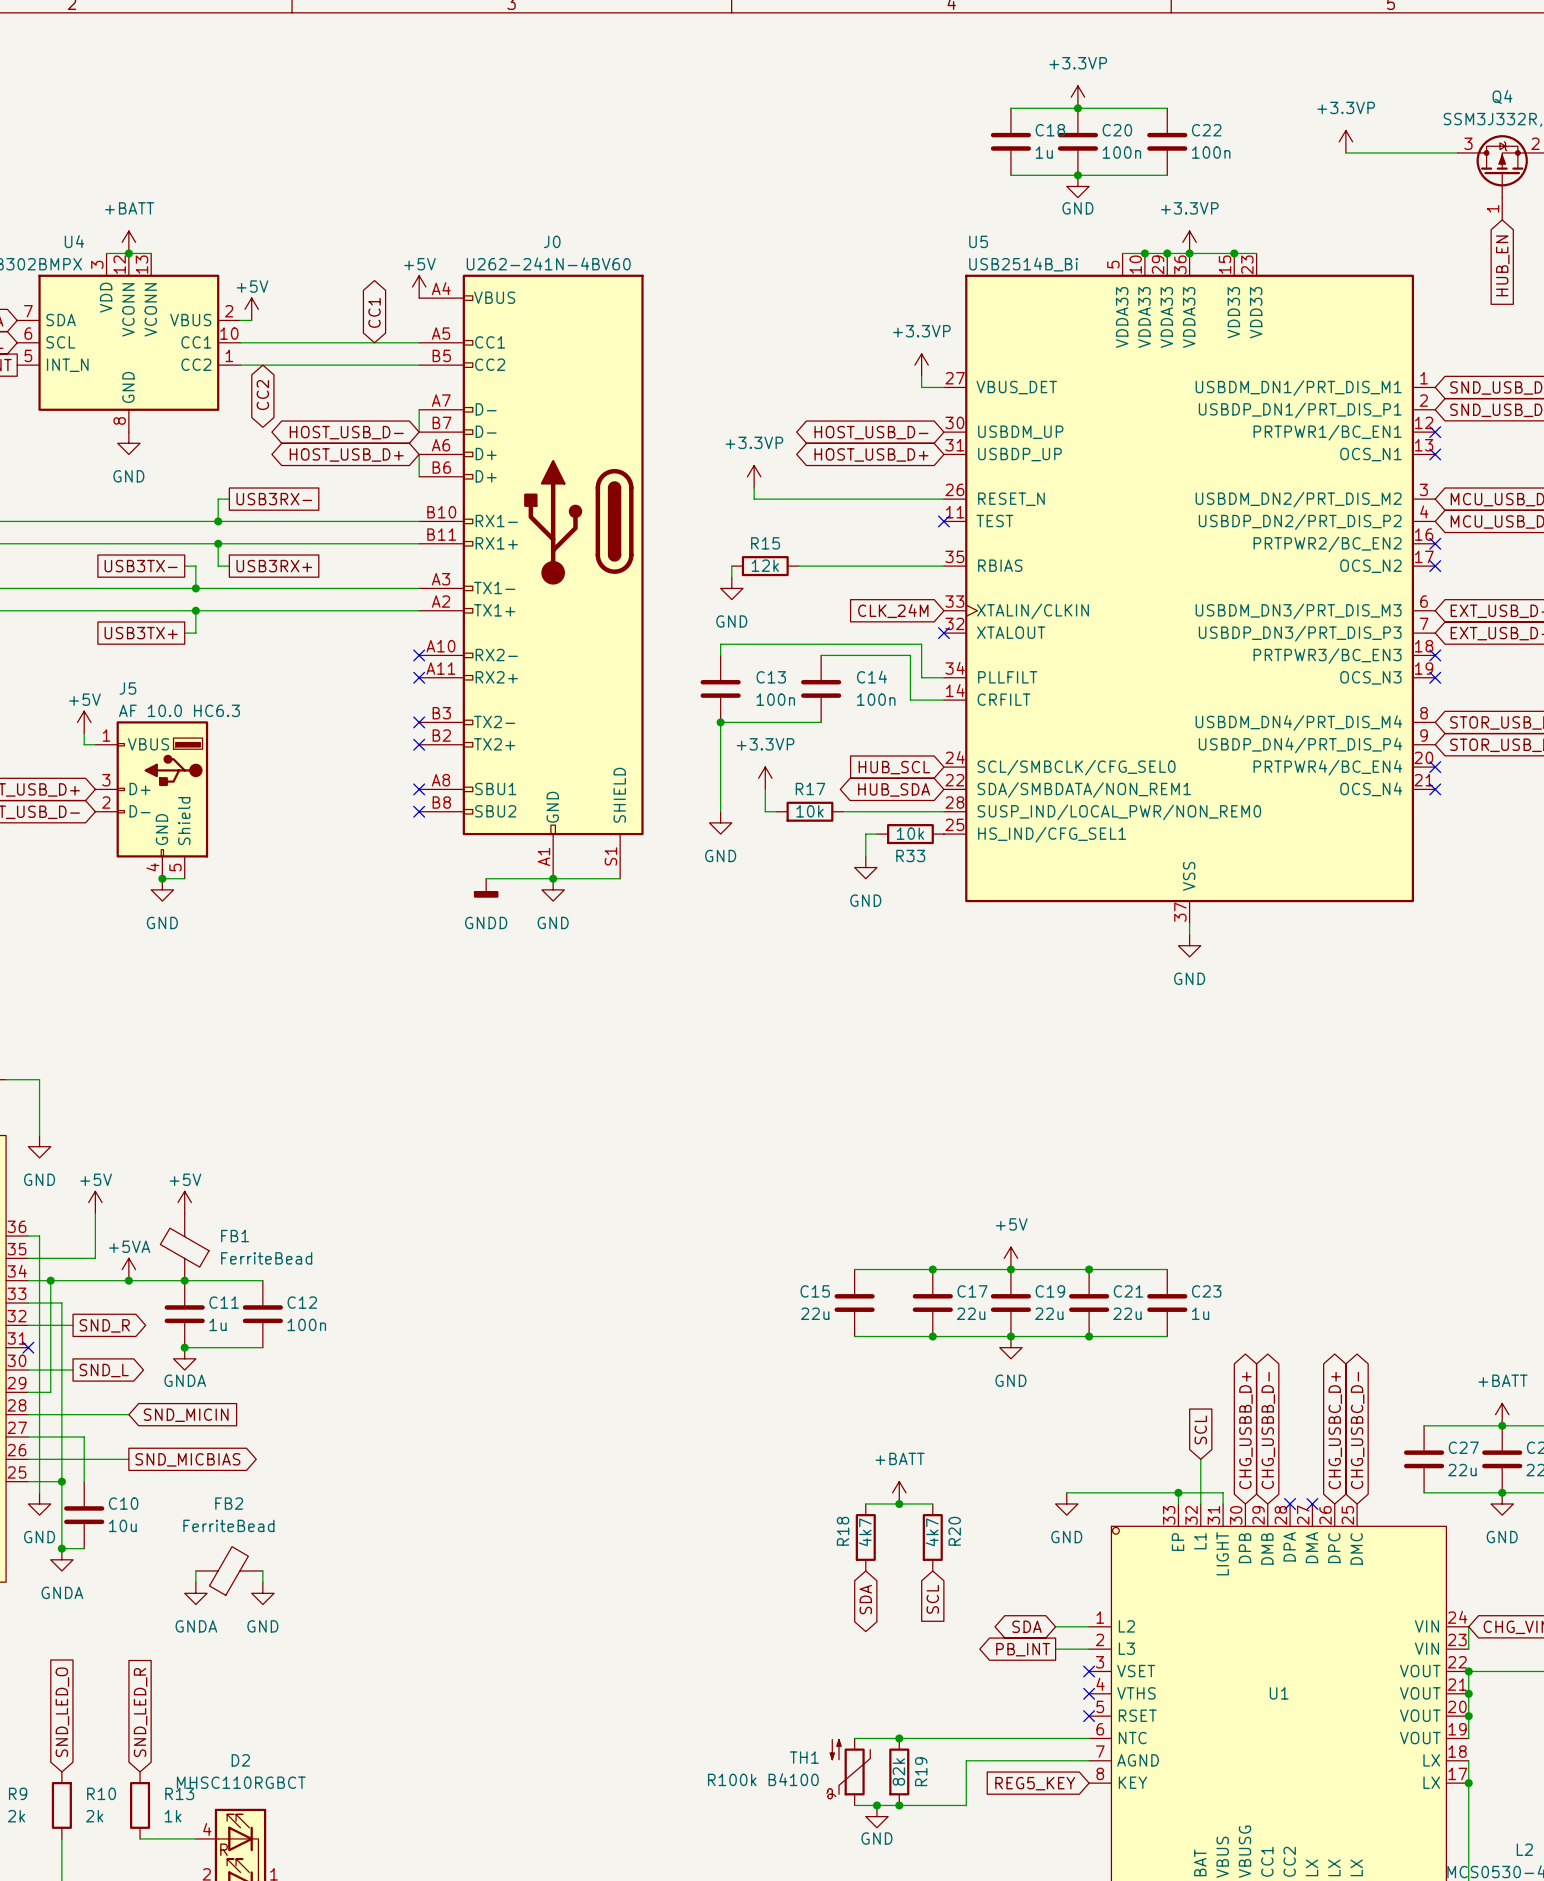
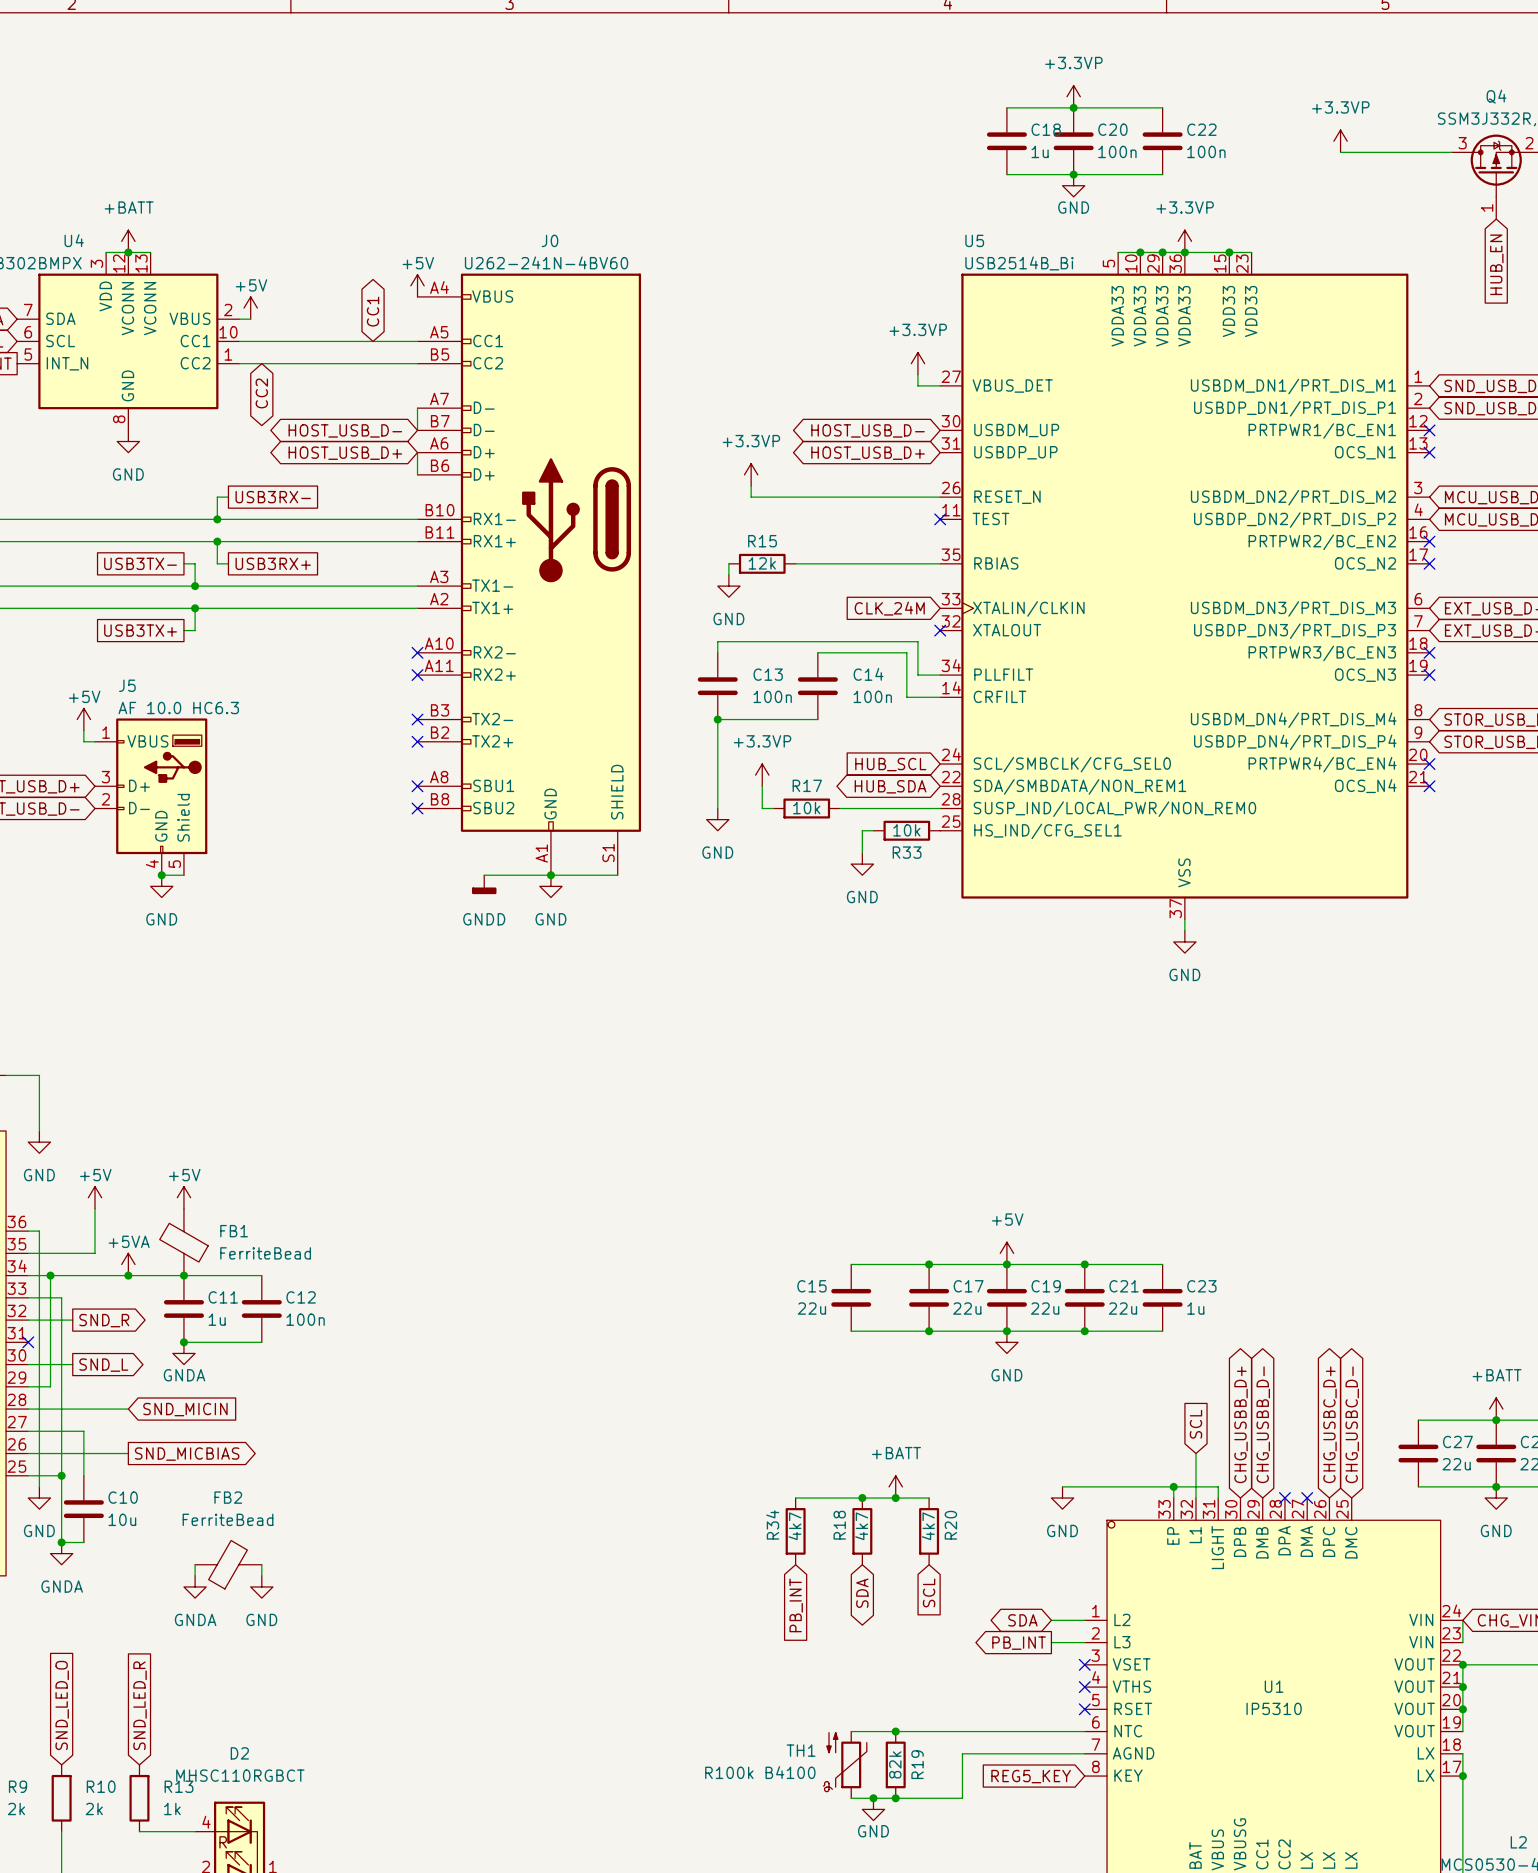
wire: none -> (795, 1498) (862, 1498)
junction: none -> (862, 1498)
R34: none -> 4k7 (795, 1531)
global label: none -> PB_INT (796, 1605)
U1 value: none -> IP5310 (1274, 1708)

